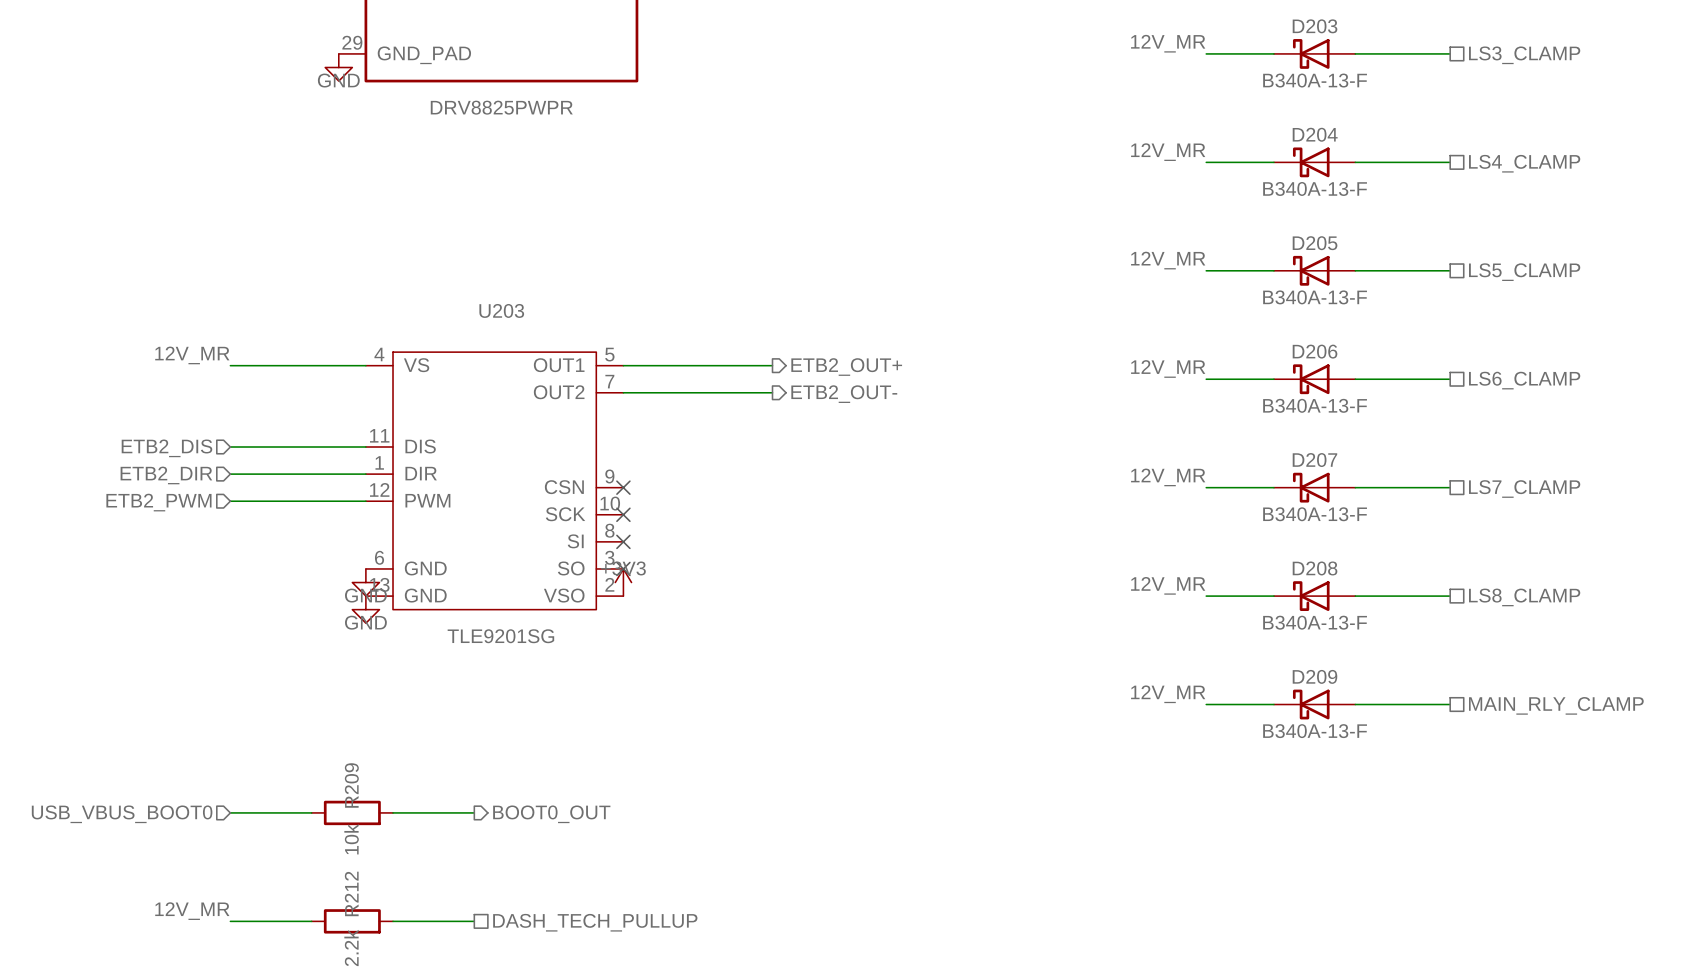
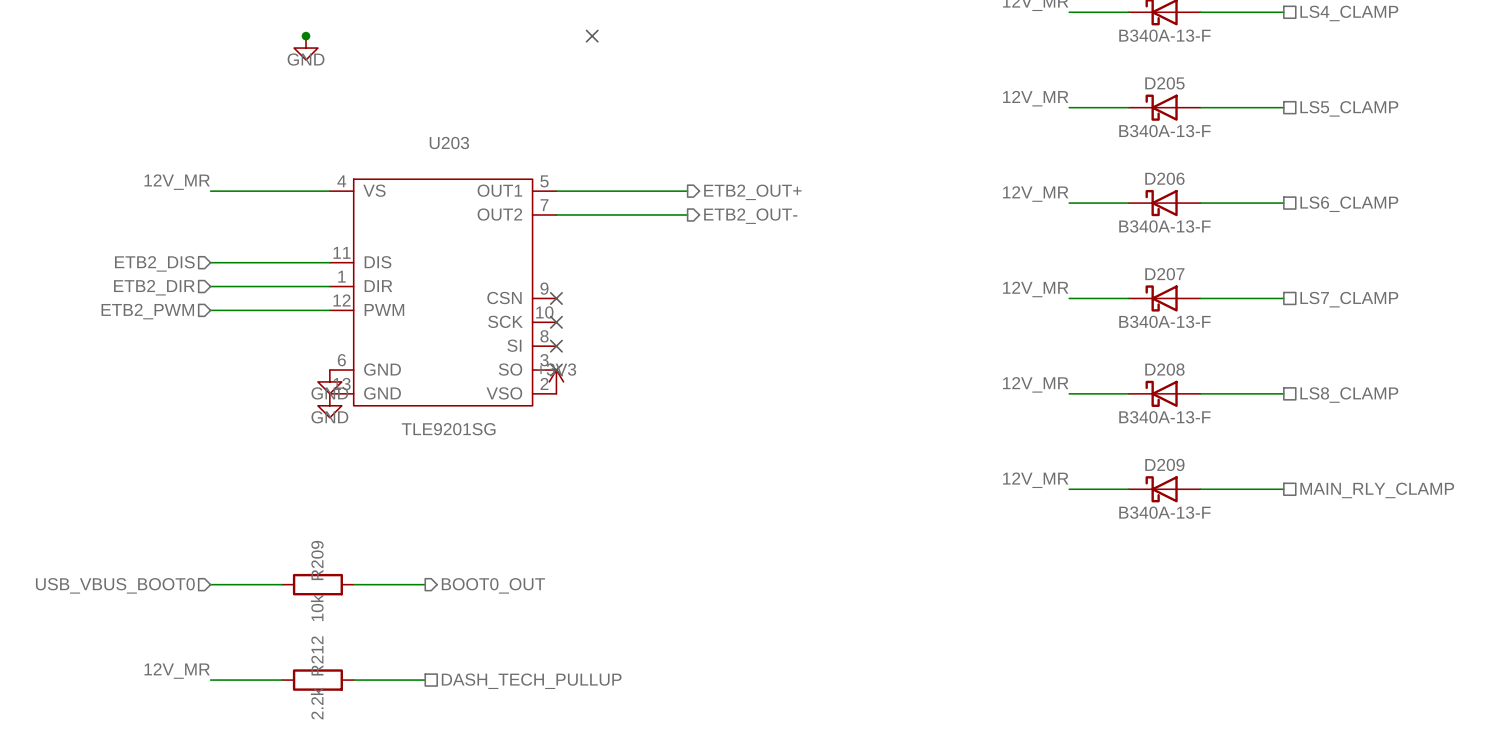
junction: none -> (306, 36)
no-connect mark: none -> (592, 36)
power symbol: none -> GND (306, 48)

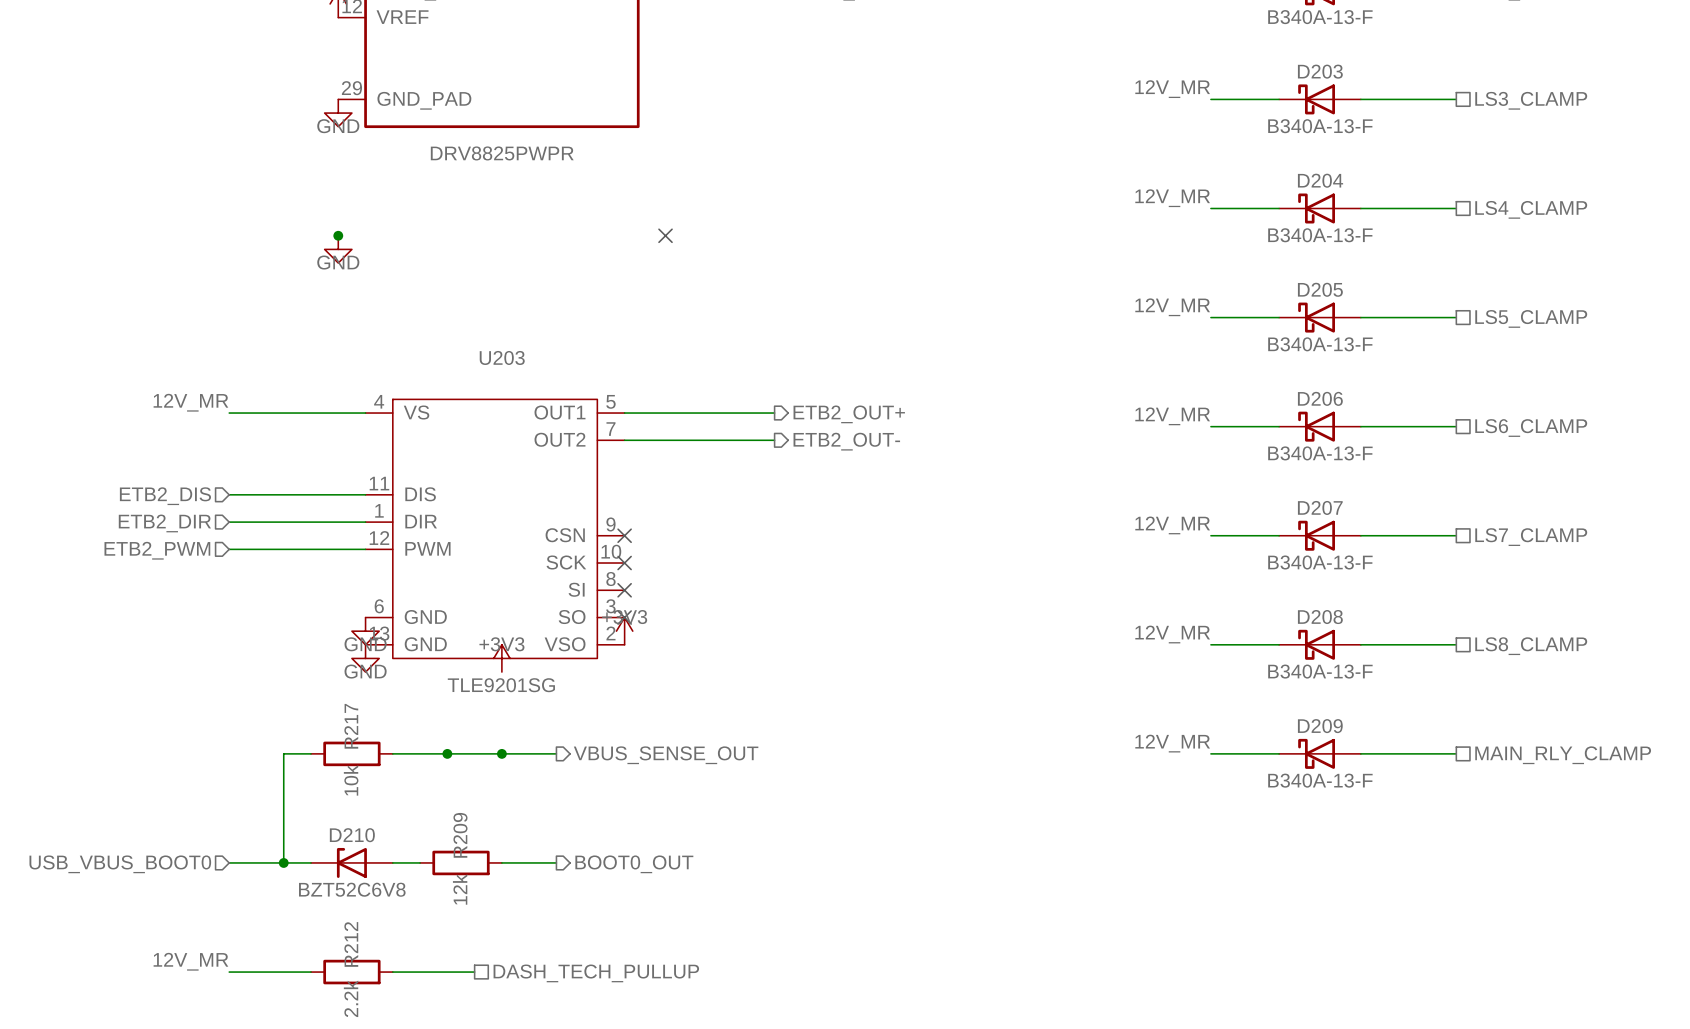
power symbol: none -> +3V3 (501, 658)
wire: none -> (311, 753) (283, 753) (283, 862)
R217: none -> 10k (351, 753)
wire: none -> (392, 753) (556, 753)
junction: none -> (447, 753)
junction: none -> (501, 753)
hierarchical label: none -> VBUS_SENSE_OUT (666, 755)
junction: none -> (283, 862)
R209 position: (317, 584) -> (460, 862)
D210: none -> BZT52C6V8 (351, 862)
wire: (377, 584) (425, 584) -> (501, 862) (556, 862)
hierarchical label position: BOOT0_OUT (493, 585) -> BOOT0_OUT (634, 864)
R209 value: 10k (317, 607) -> 12k (460, 889)

